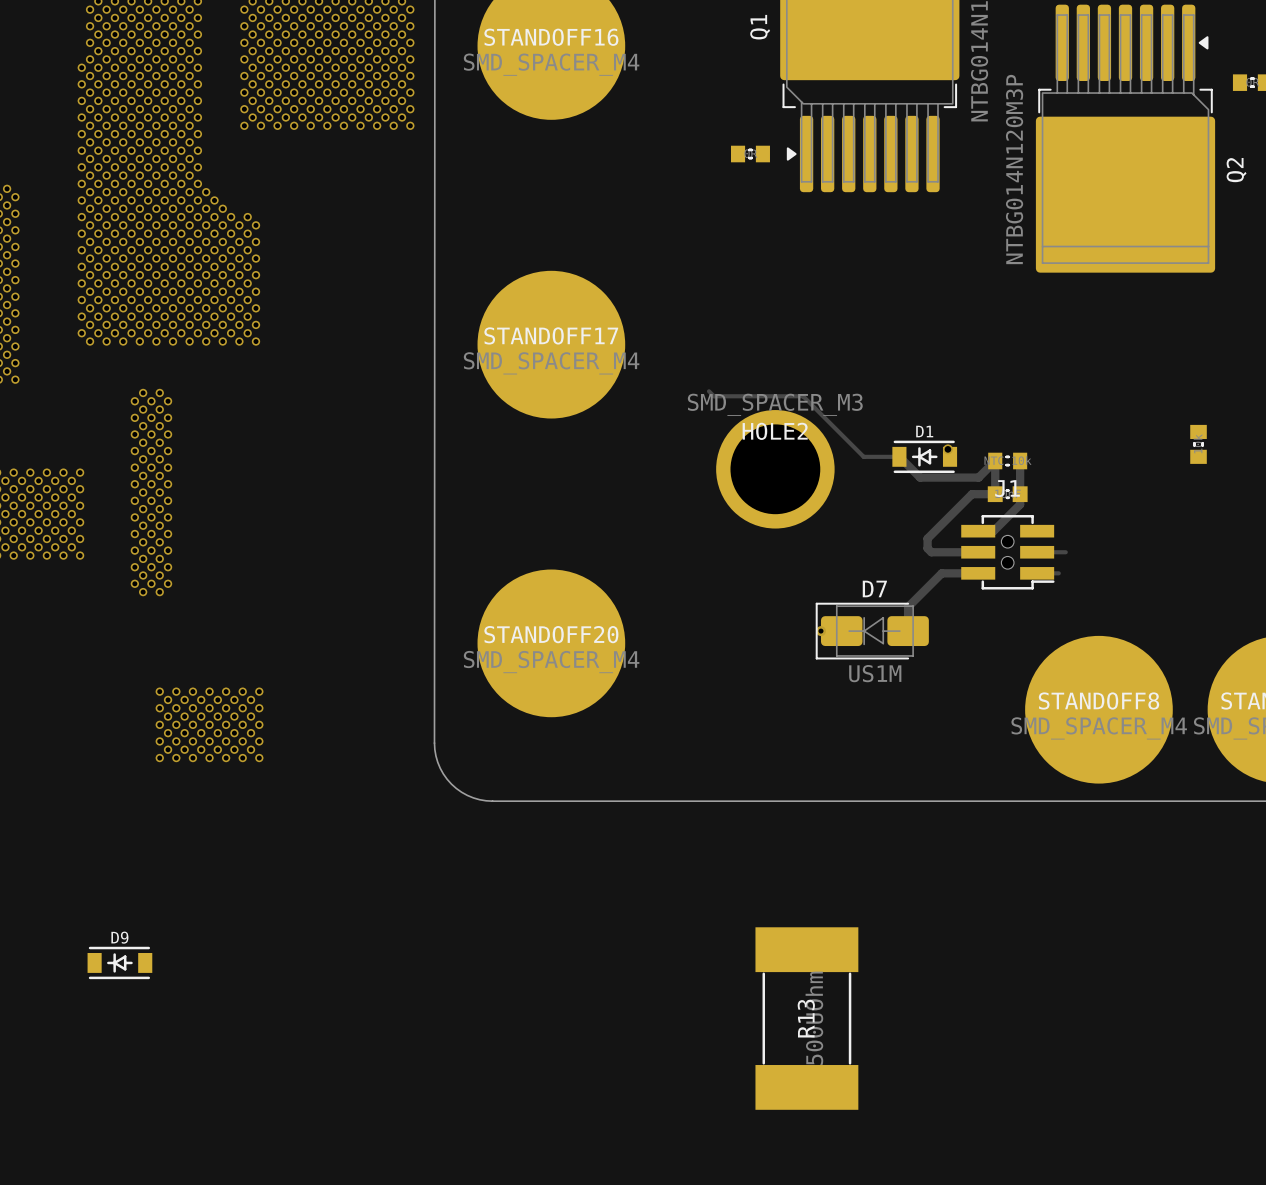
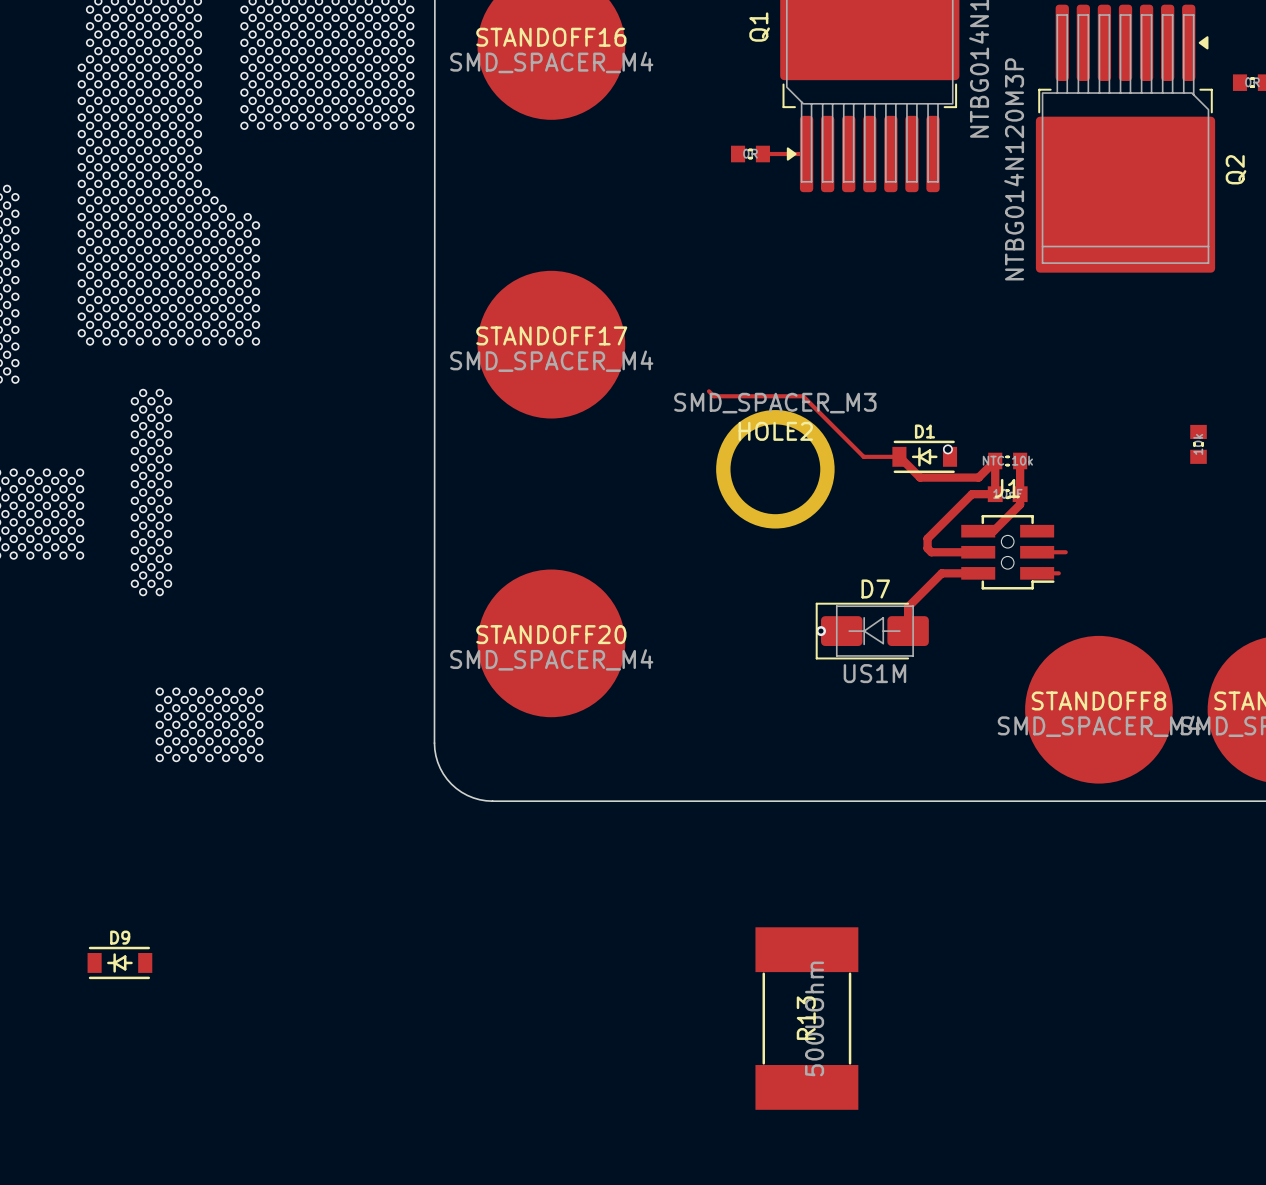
track: none -> (762, 154) (806, 154)

